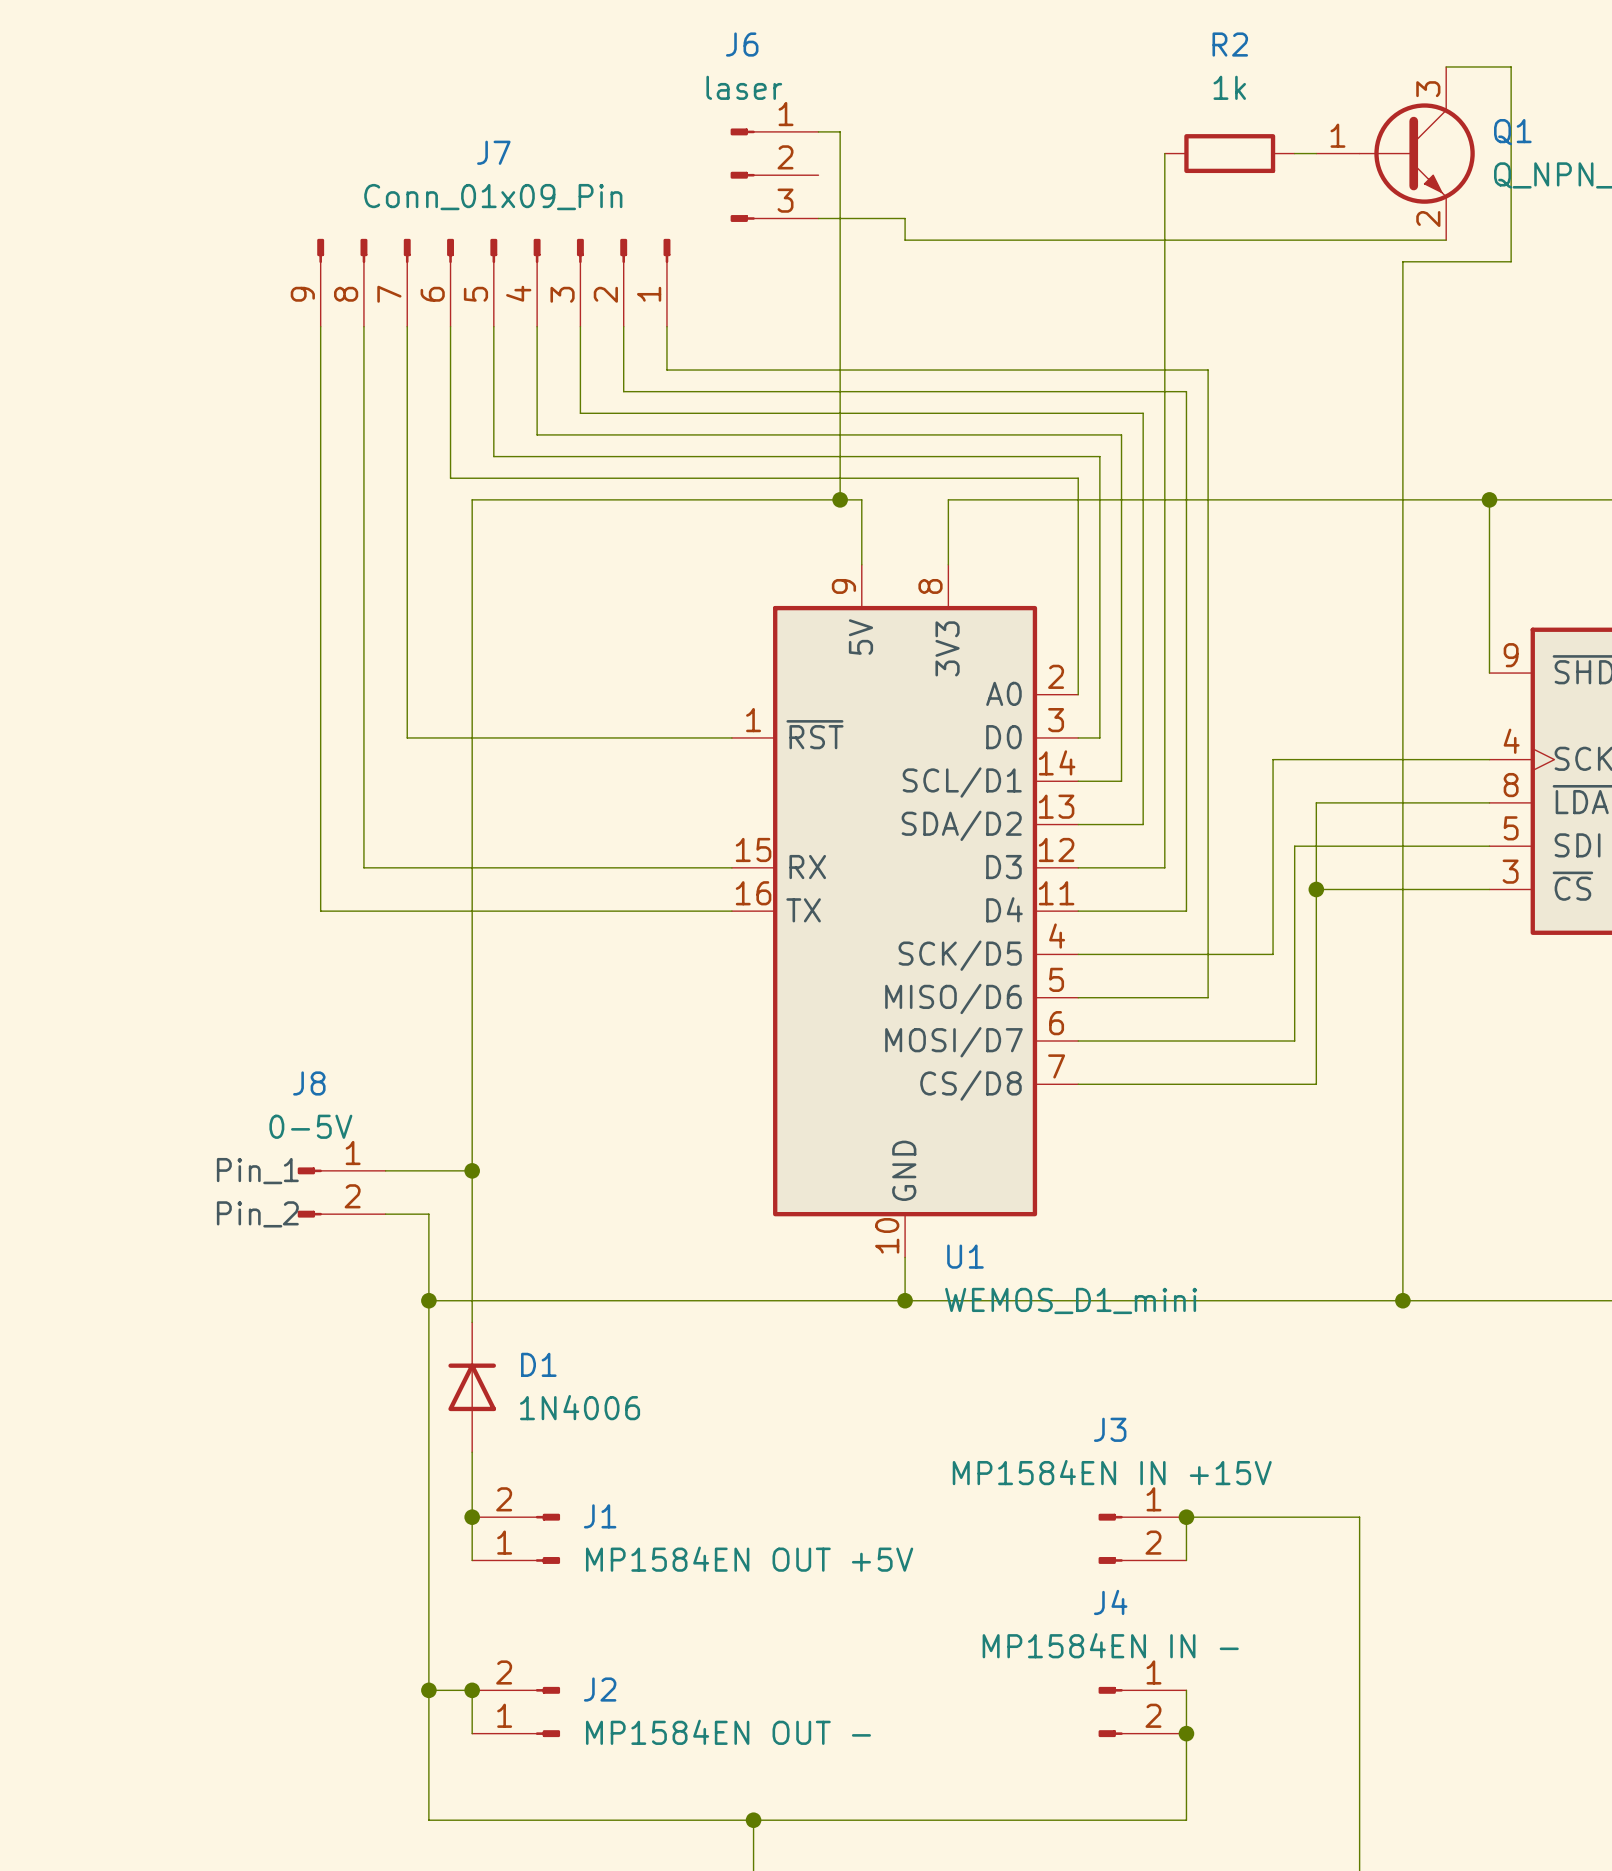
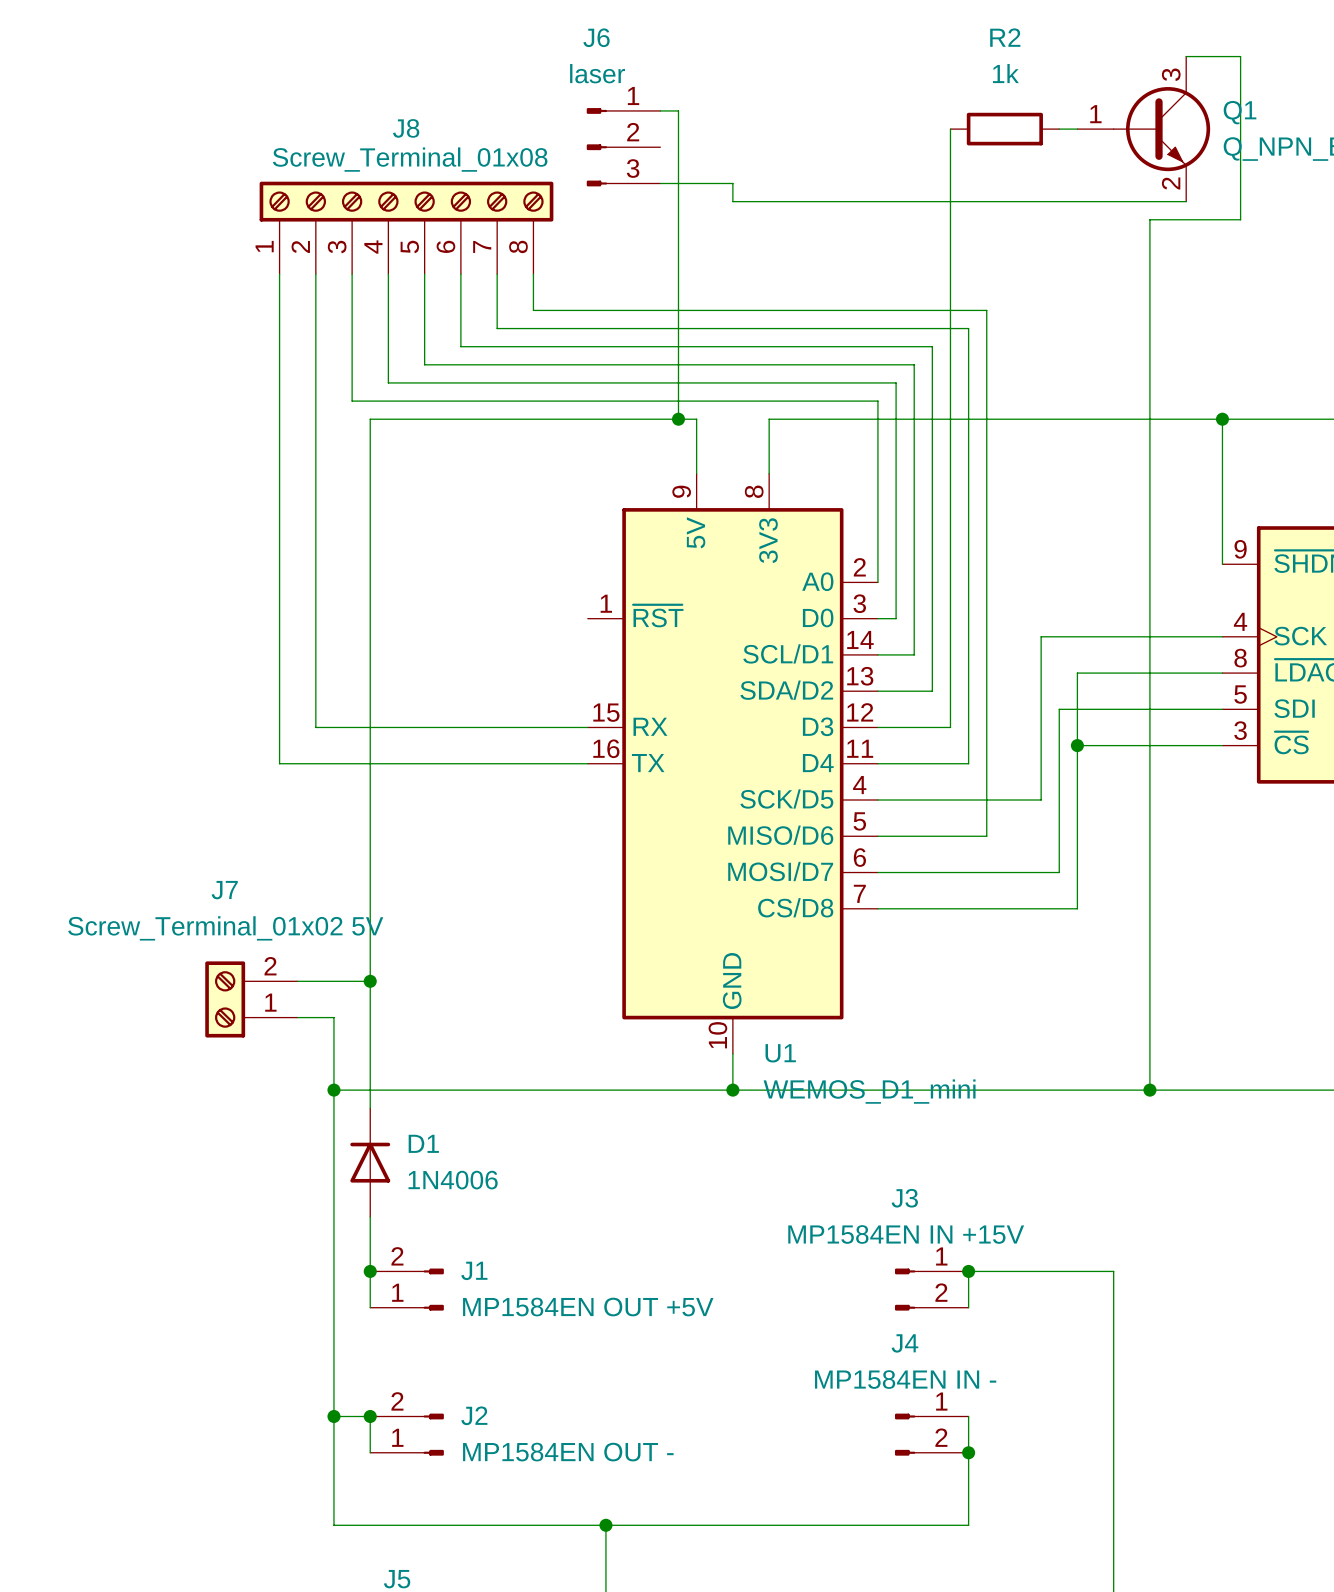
J7 value: Conn_01x09_Pin (493, 197) -> Screw_Terminal_01x02 5V (225, 928)
J7 symbol: [317, 238, 671, 327] -> [205, 961, 298, 1038]
wire: (320, 326) (320, 911) (363, 911) -> none
wire: (407, 737) (731, 737) -> (315, 618) (315, 727)
wire: (363, 867) (407, 867) -> (279, 727) (279, 763)
J8 value: 0-5V (310, 1126) -> Screw_Terminal_01x08 (410, 159)
J8 symbol: [297, 1167, 386, 1218] -> [259, 181, 554, 275]

